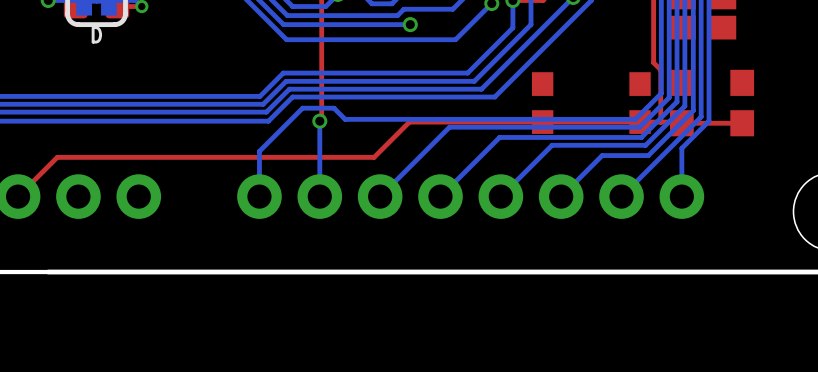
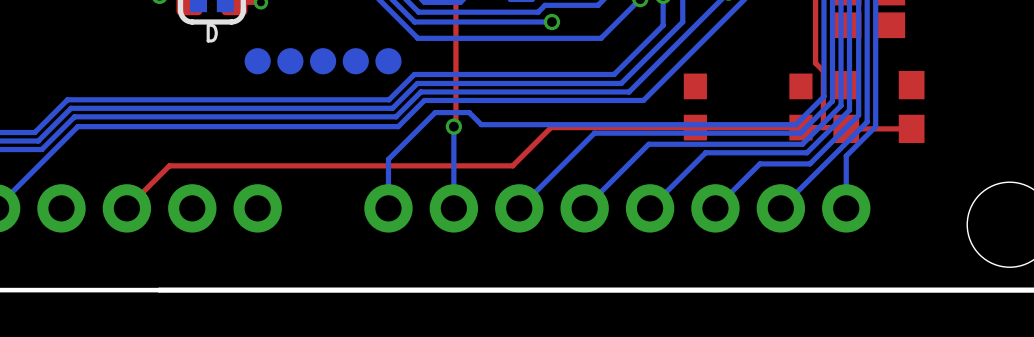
part: none -> (257, 61)
part: none -> (290, 61)
part: none -> (323, 61)
part: none -> (355, 61)
part: none -> (388, 61)

